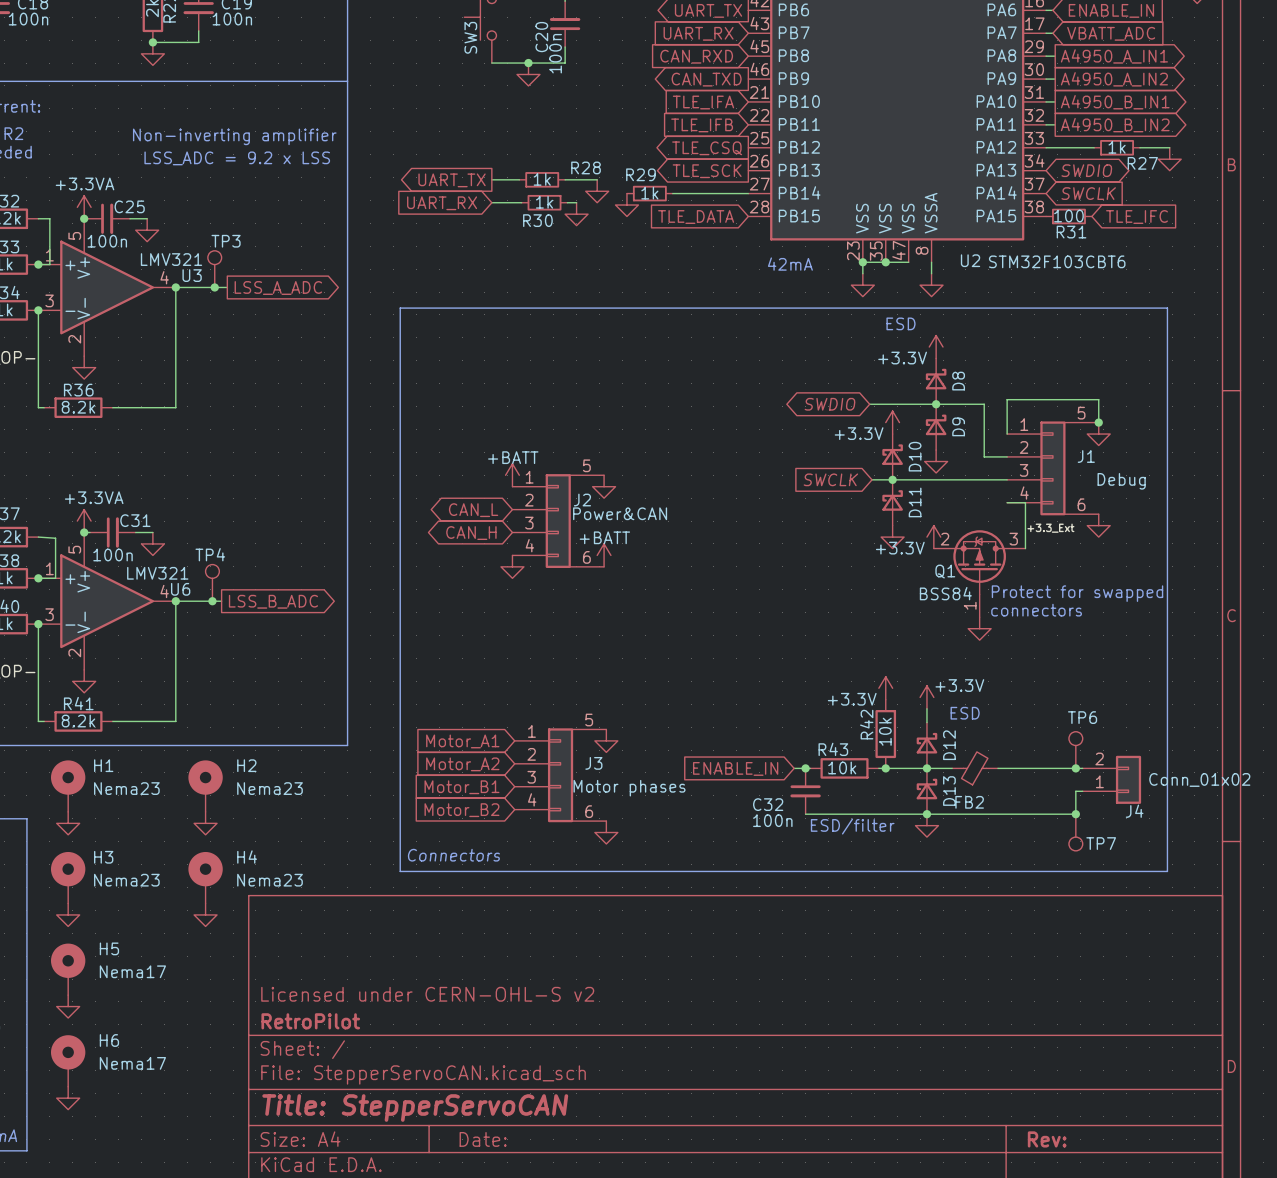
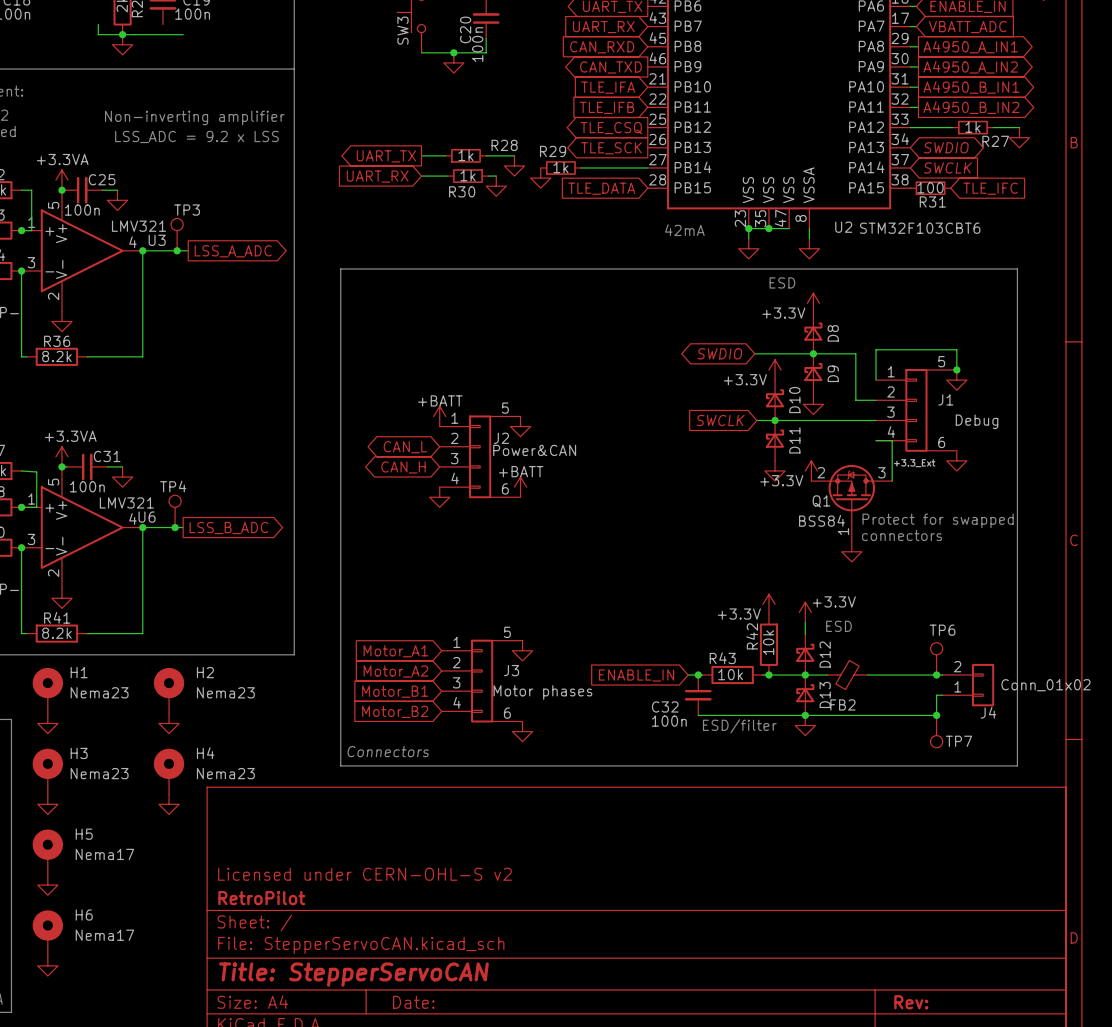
wire: none -> (98, 24) (98, 34) (122, 34)
wire: (198, 30) (198, 42) -> (183, 34) (162, 34)

